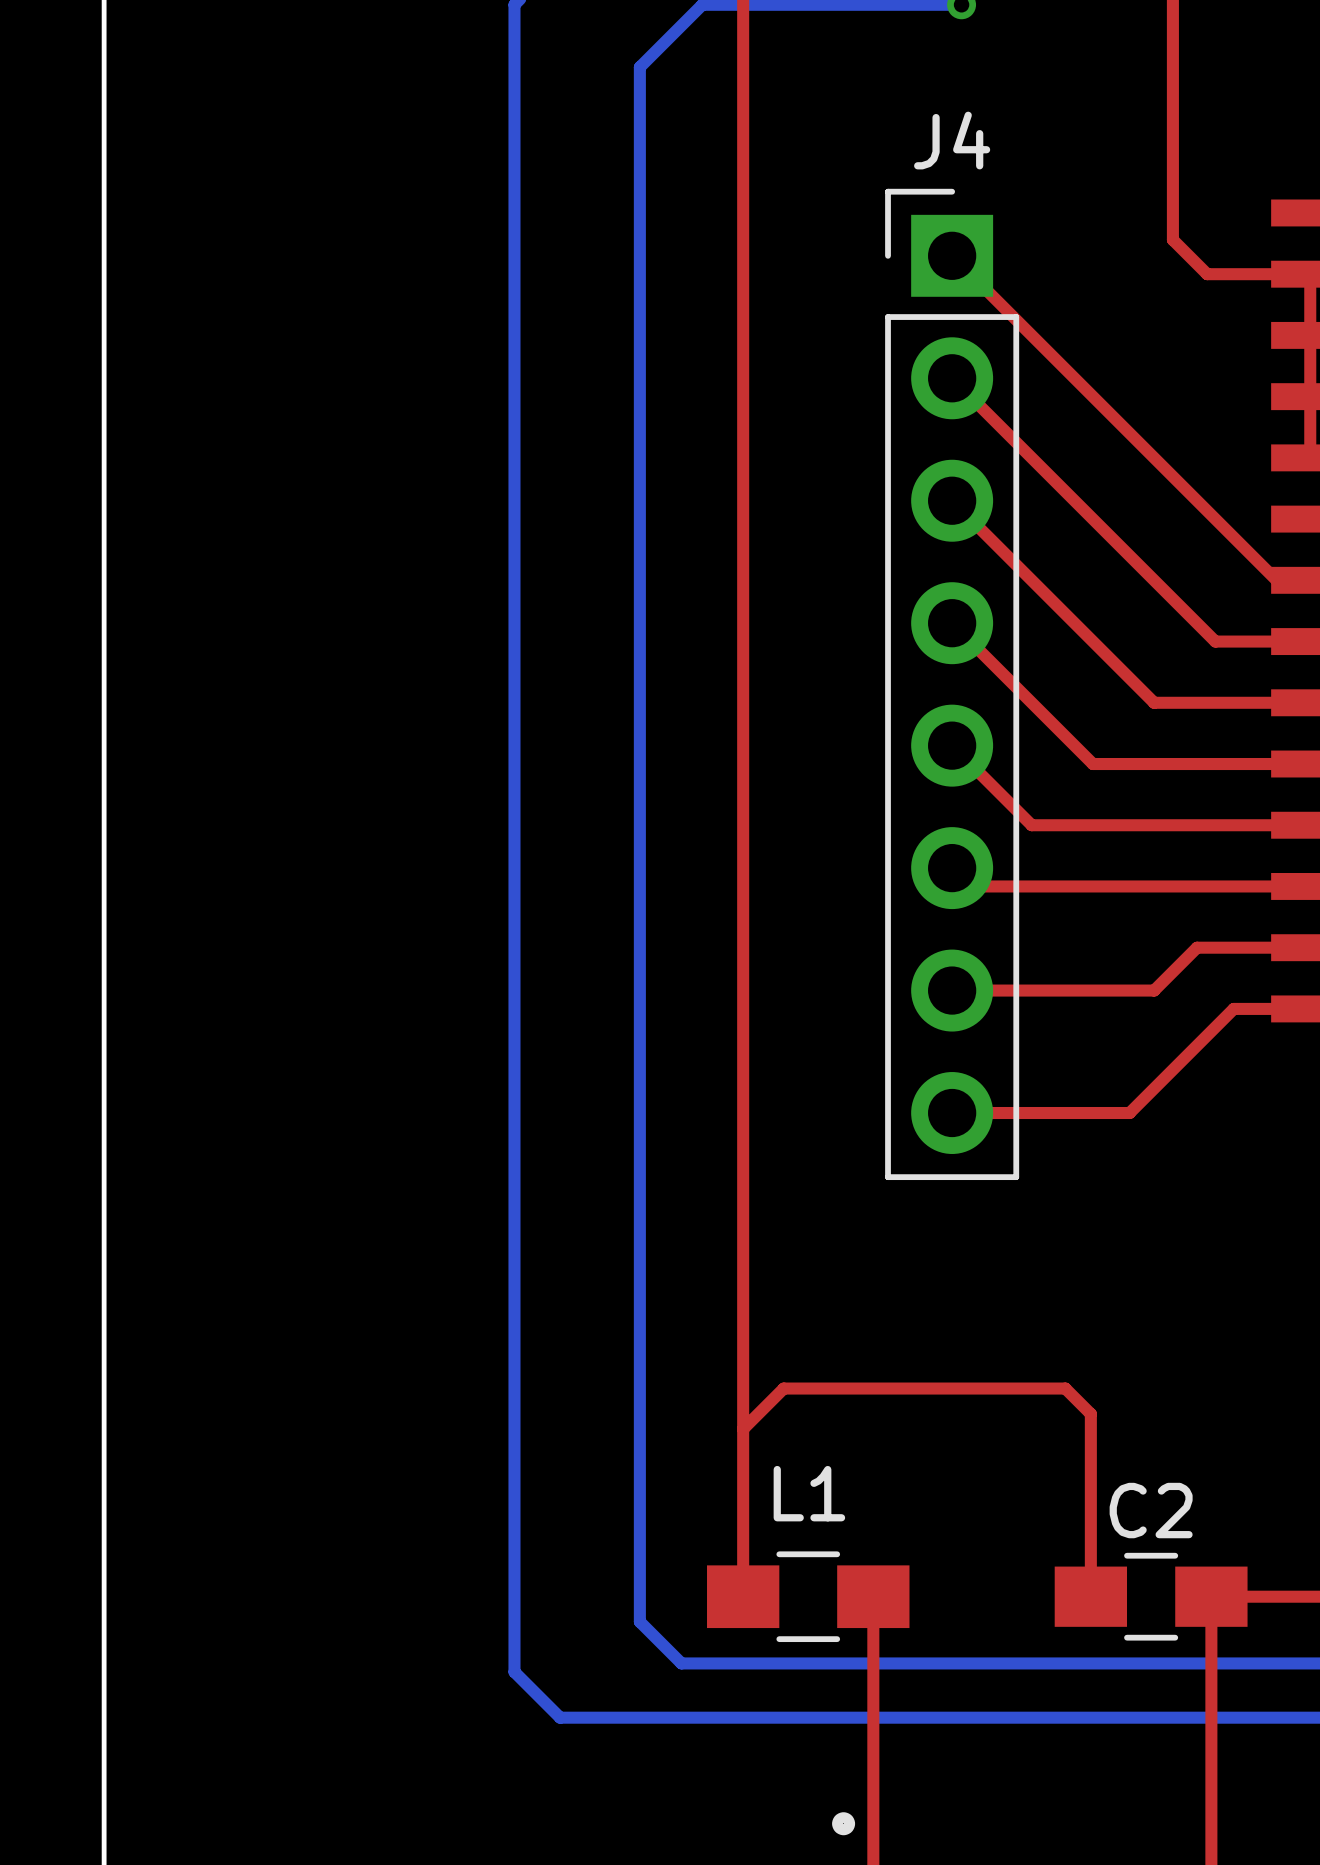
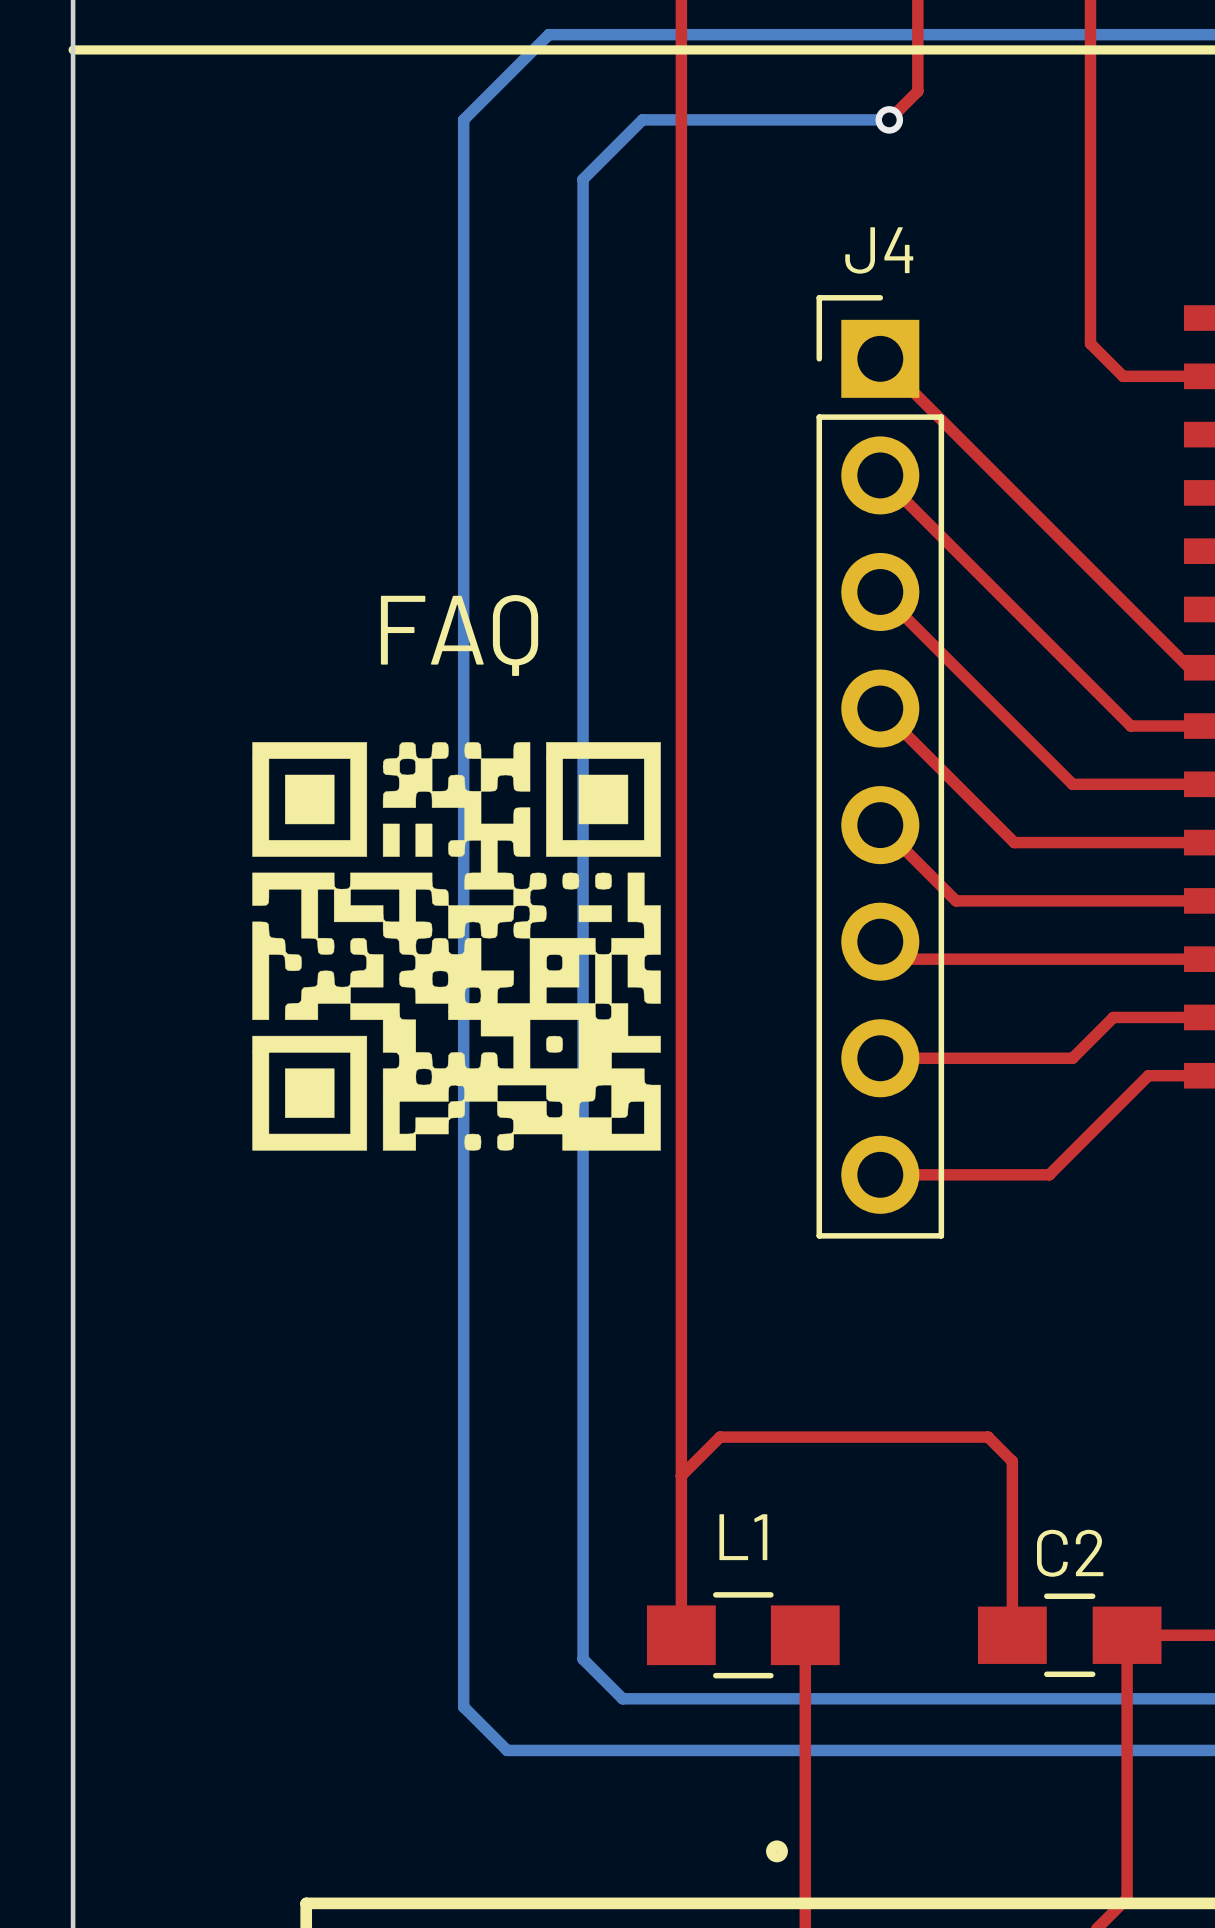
text: none -> FAQ (459, 635)
drawing: none -> [252, 742, 661, 1151]

